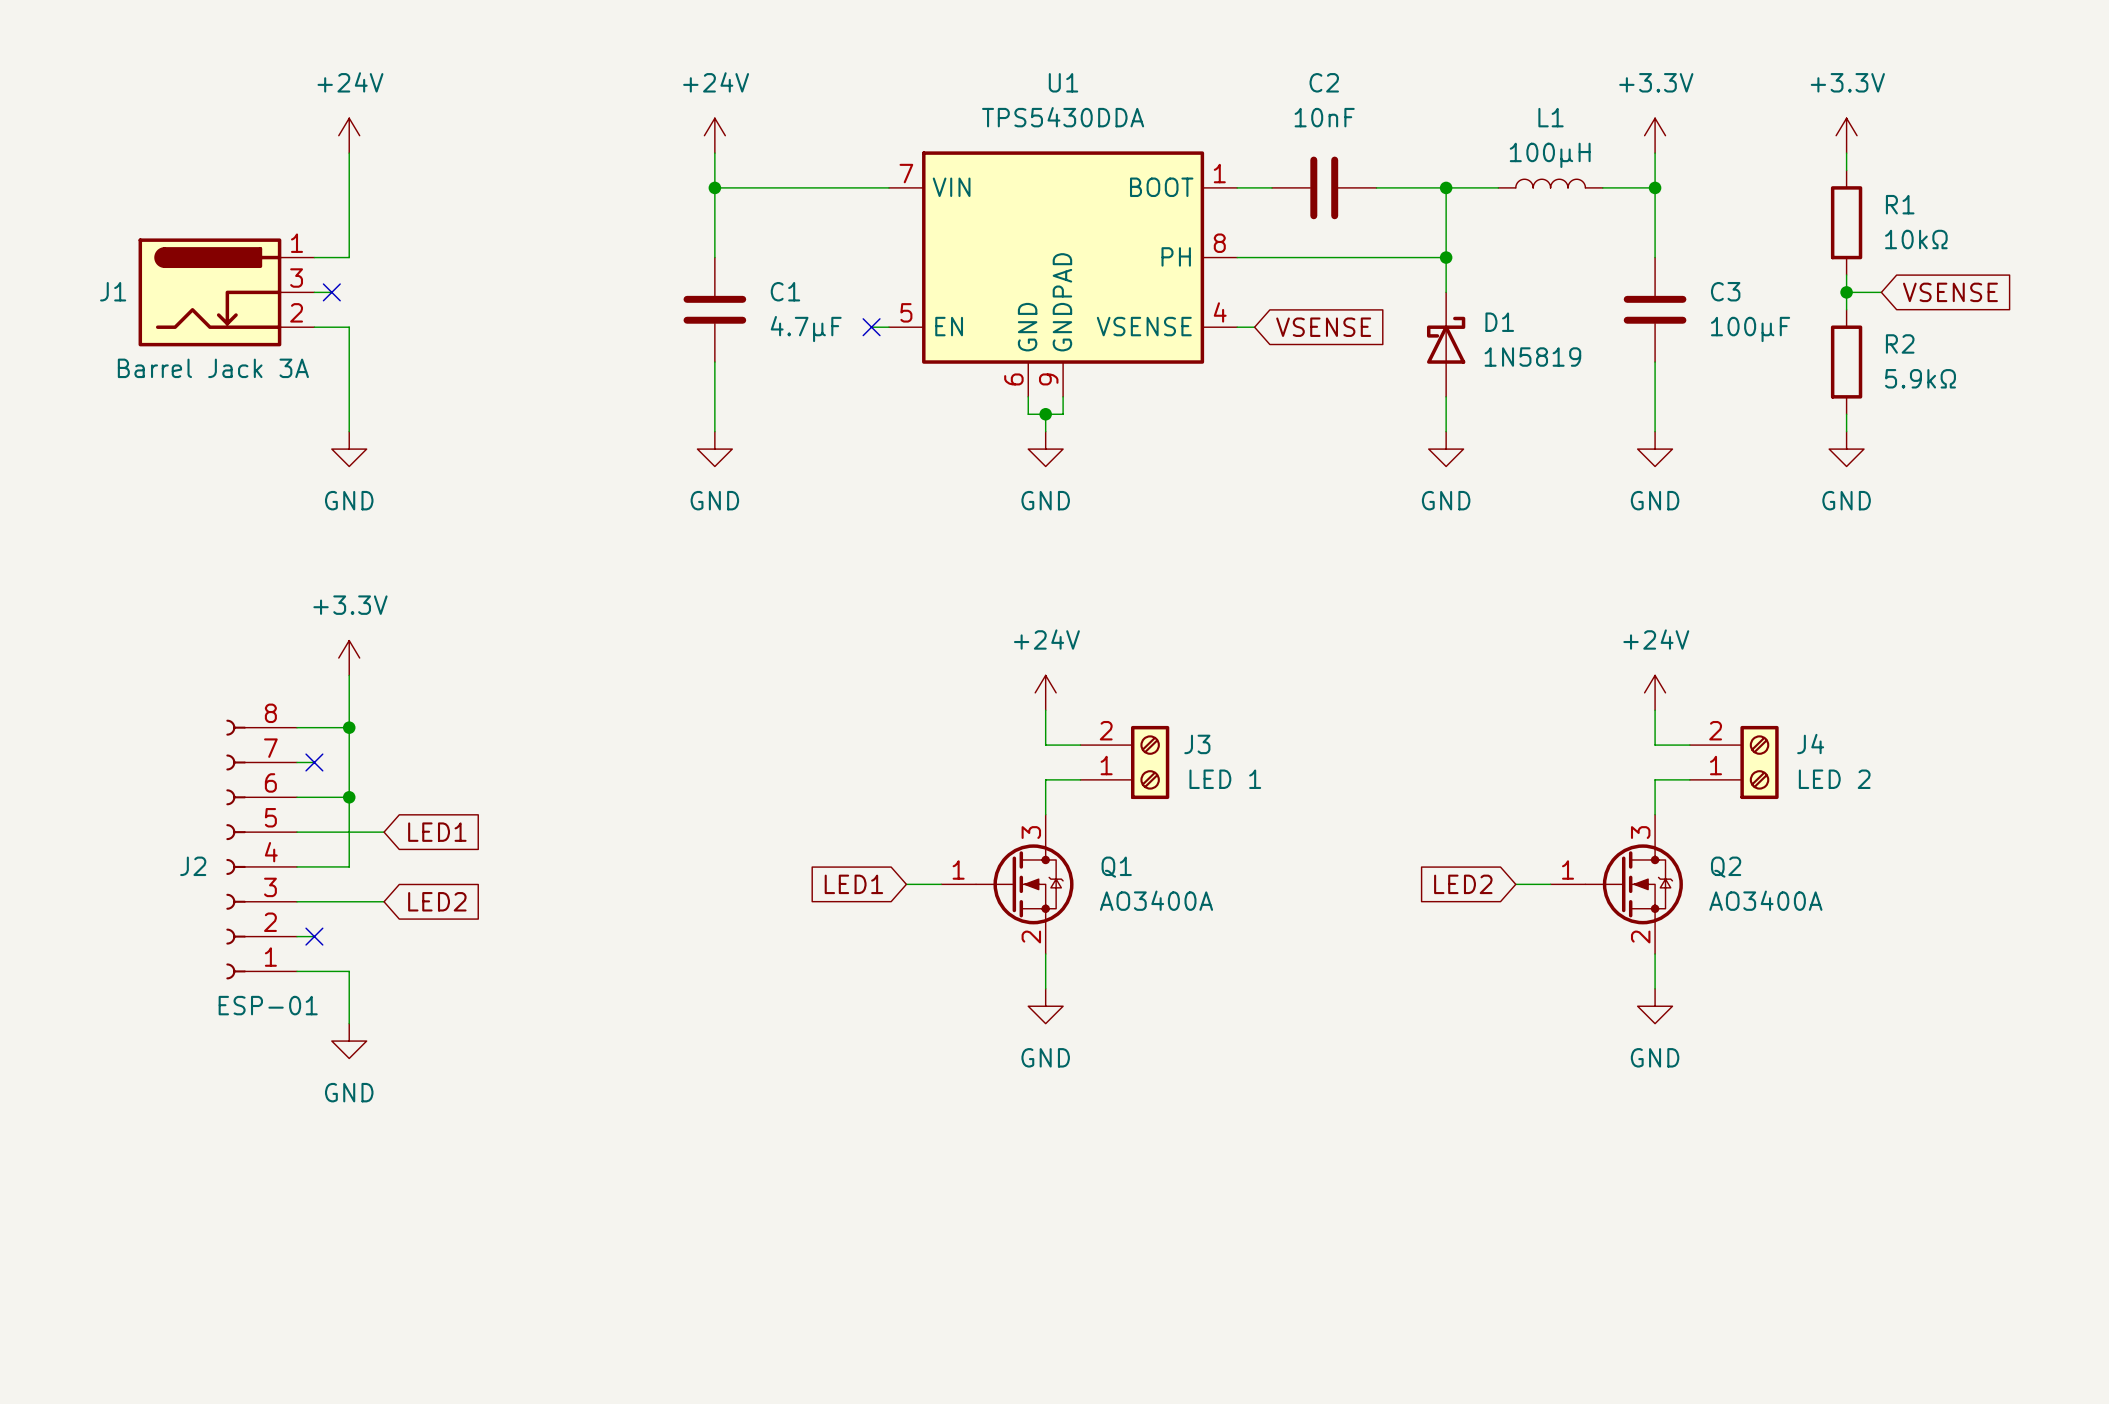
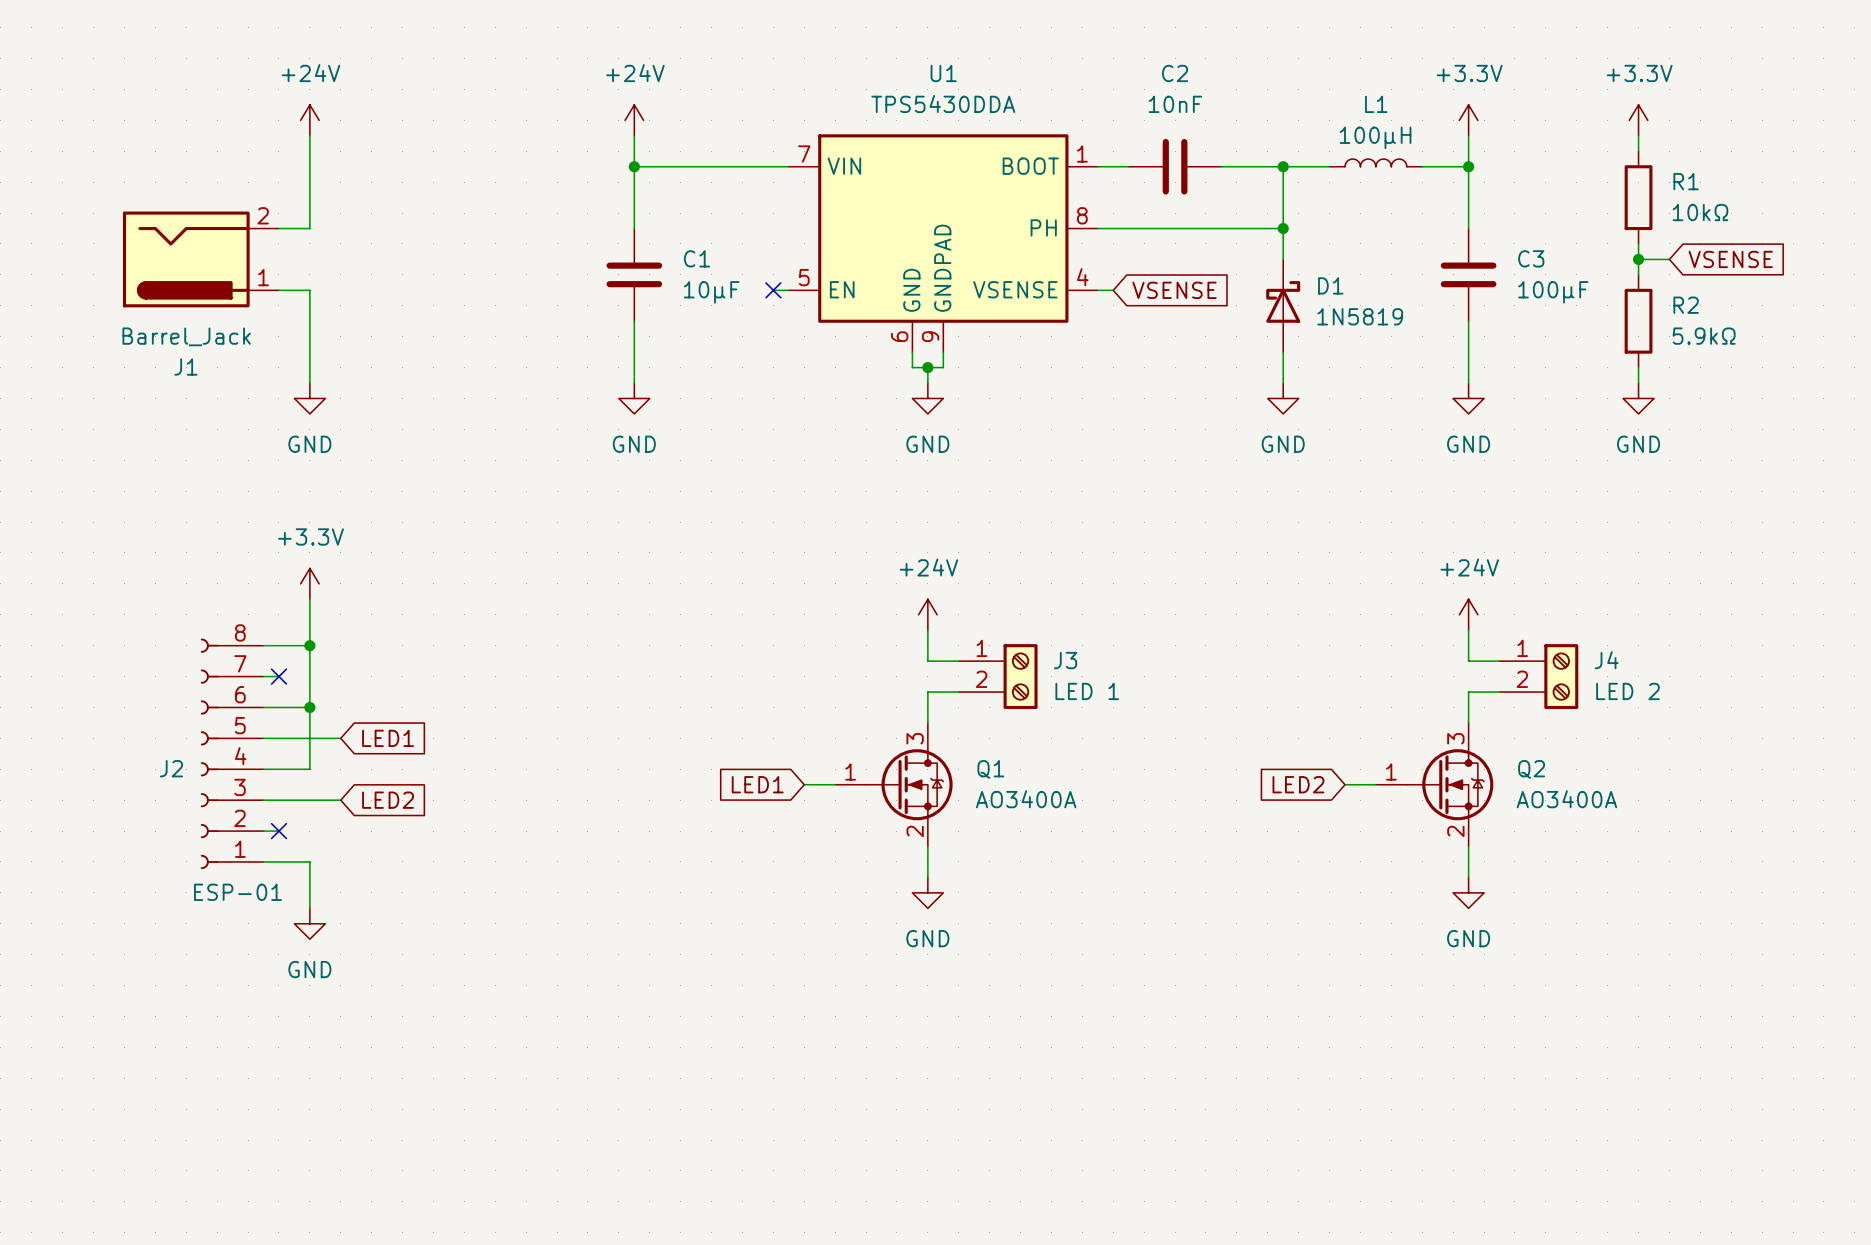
J1 symbol: [138, 238, 315, 347] -> [122, 211, 279, 308]
J1 name position: J1 (113, 291) -> J1 (185, 367)
wire: (314, 292) (331, 292) -> none
no-connect mark: (331, 292) -> none
C1 value: 4.7µF (806, 329) -> 10µF (711, 292)
J1 value: Barrel Jack 3A (213, 368) -> Barrel_Jack (186, 336)
J3 flip: as is (1150, 762) -> up-down (1020, 676)
J4 flip: as is (1759, 762) -> up-down (1561, 676)

